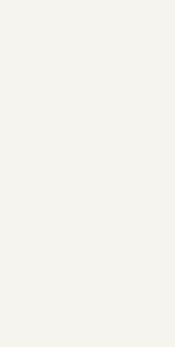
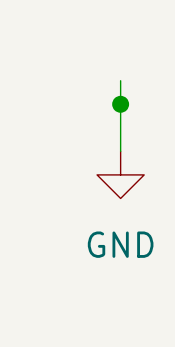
wire: none -> (120, 80) (120, 151)
junction: none -> (120, 104)
power symbol: none -> GND (120, 174)

